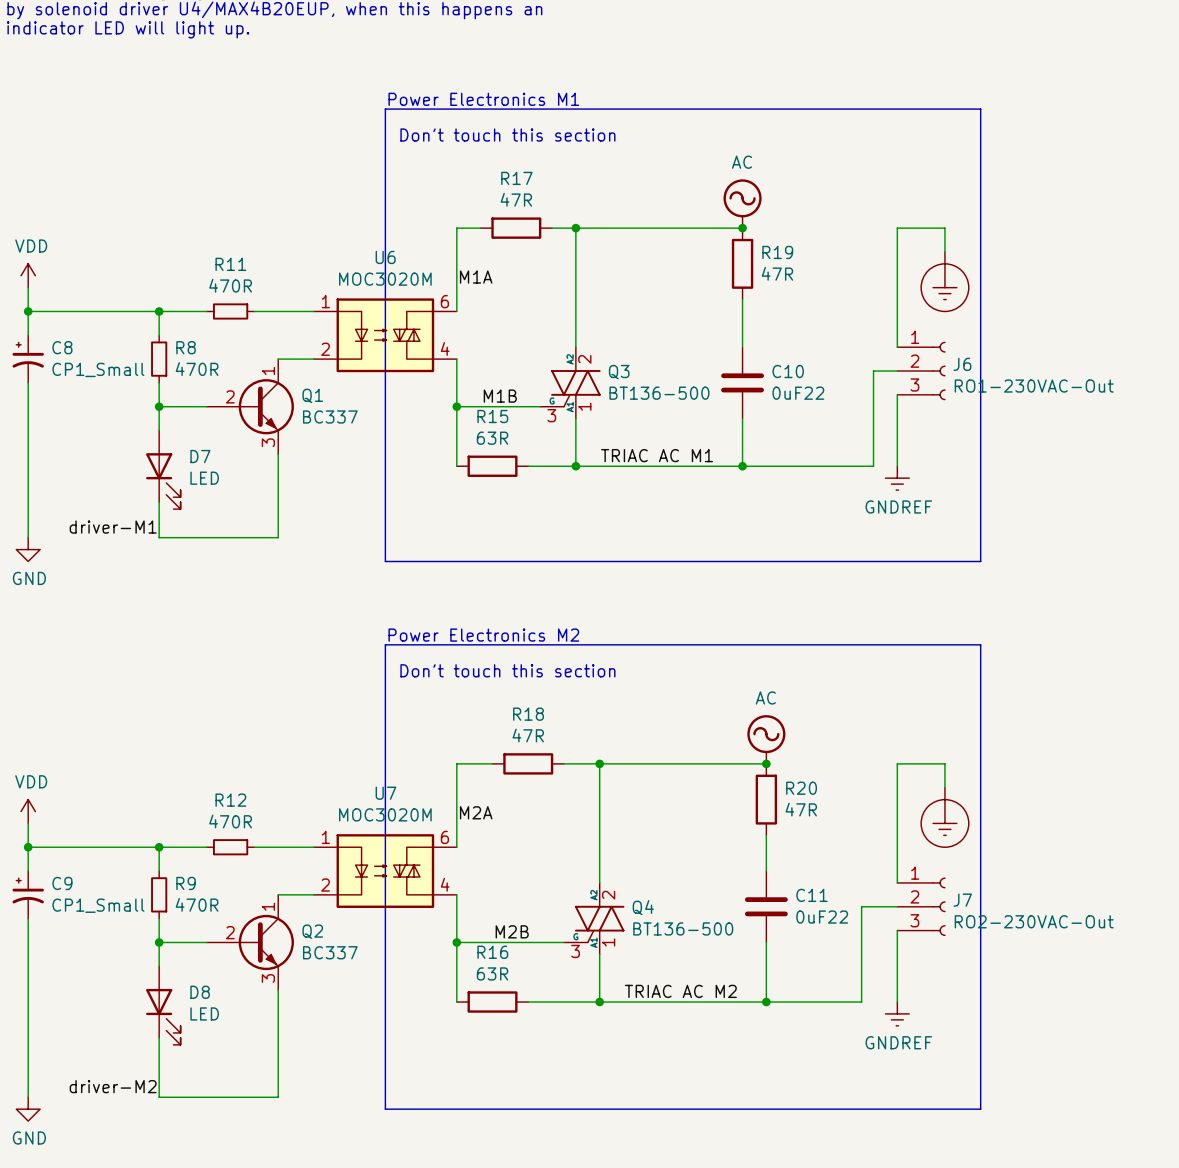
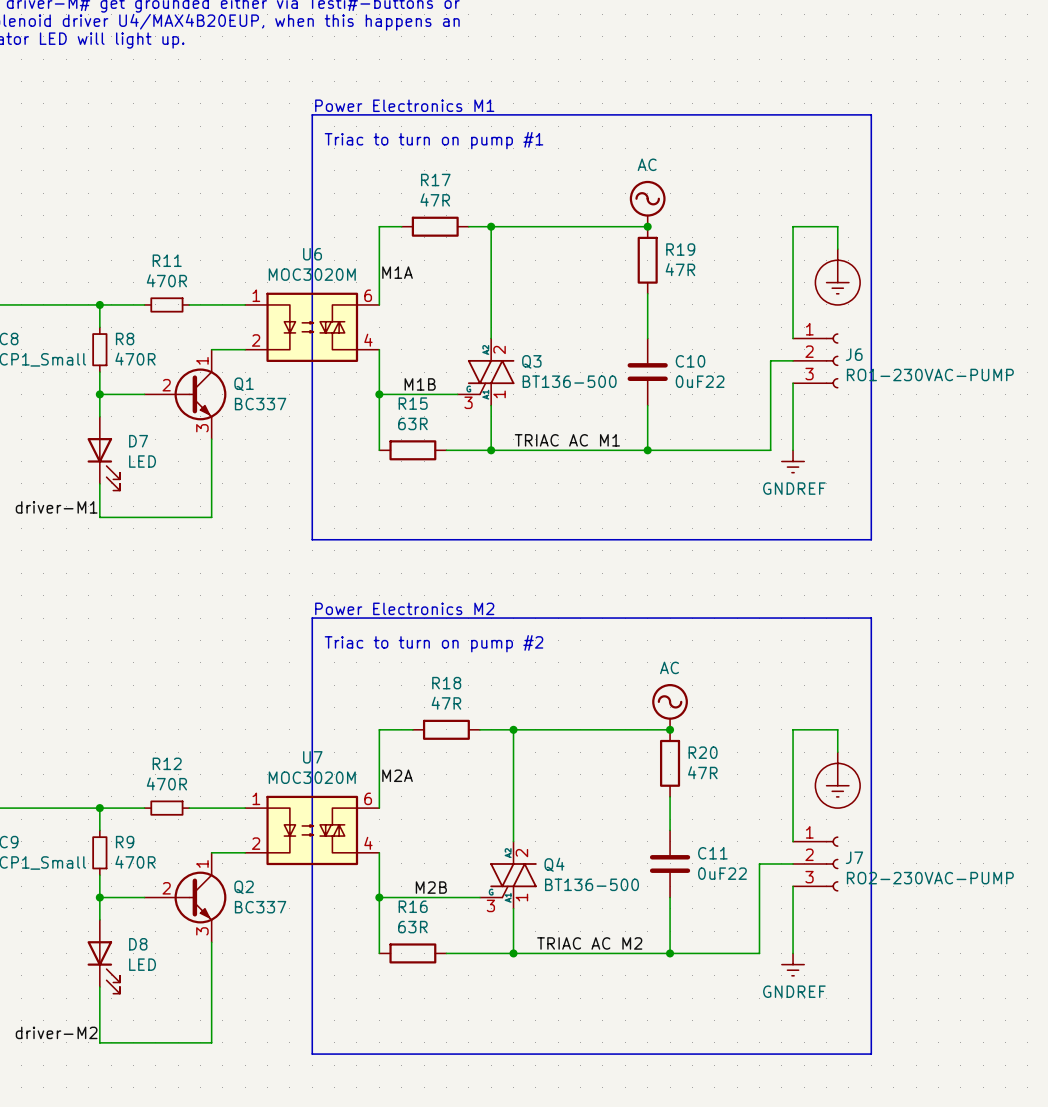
text: Don't touch this section (507, 135) -> Triac to turn on pump #1 (434, 140)
J6 value: RO1-230VAC-Out (1034, 386) -> RO1-230VAC-PUMP (930, 374)
text: Don't touch this section (507, 670) -> Triac to turn on pump #2 (434, 643)
J7 value: RO2-230VAC-Out (1034, 921) -> RO2-230VAC-PUMP (930, 878)

